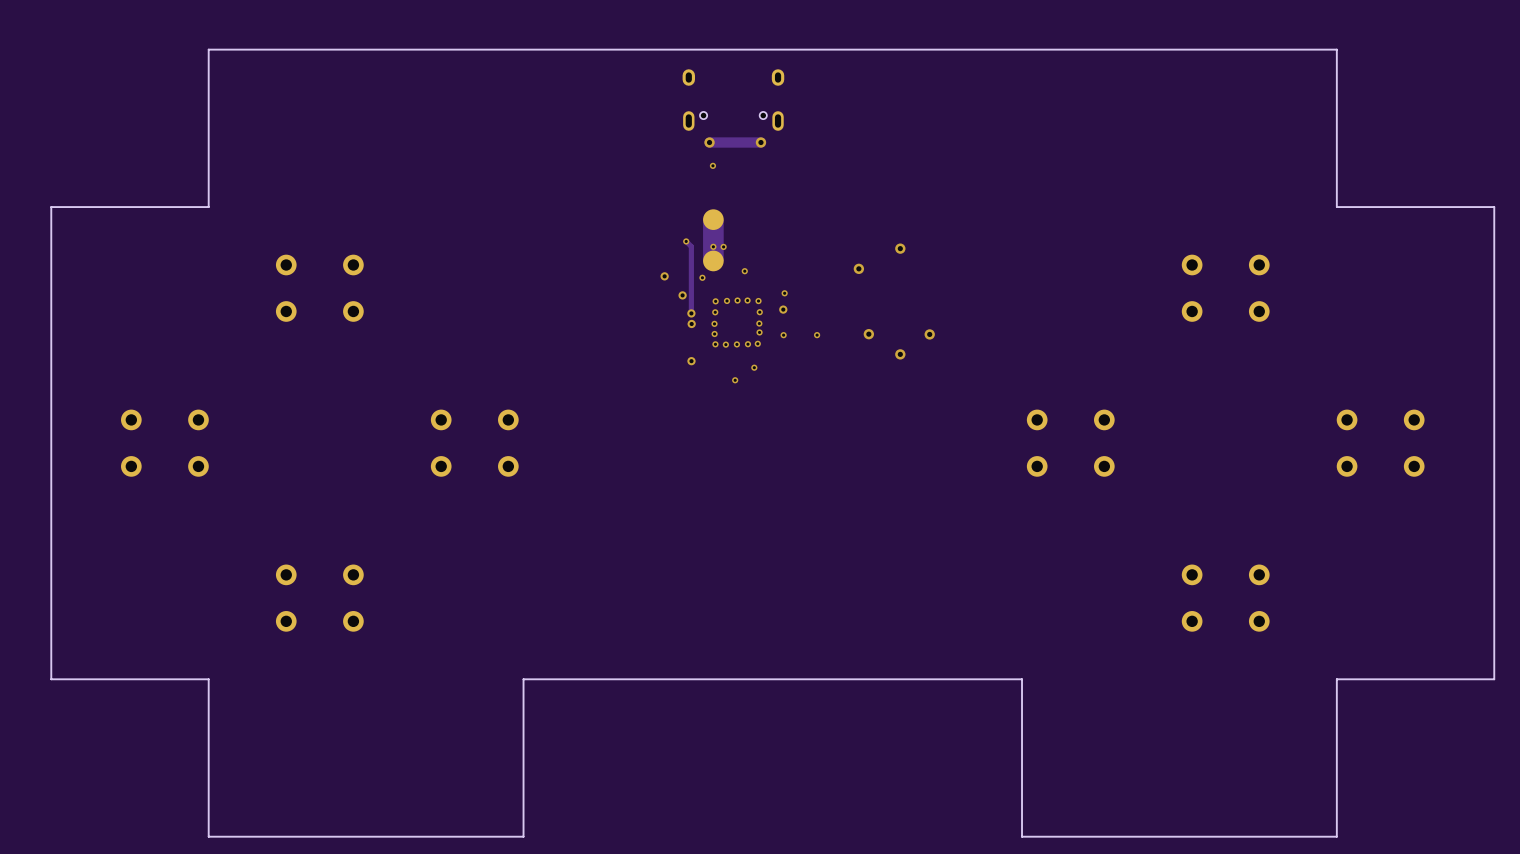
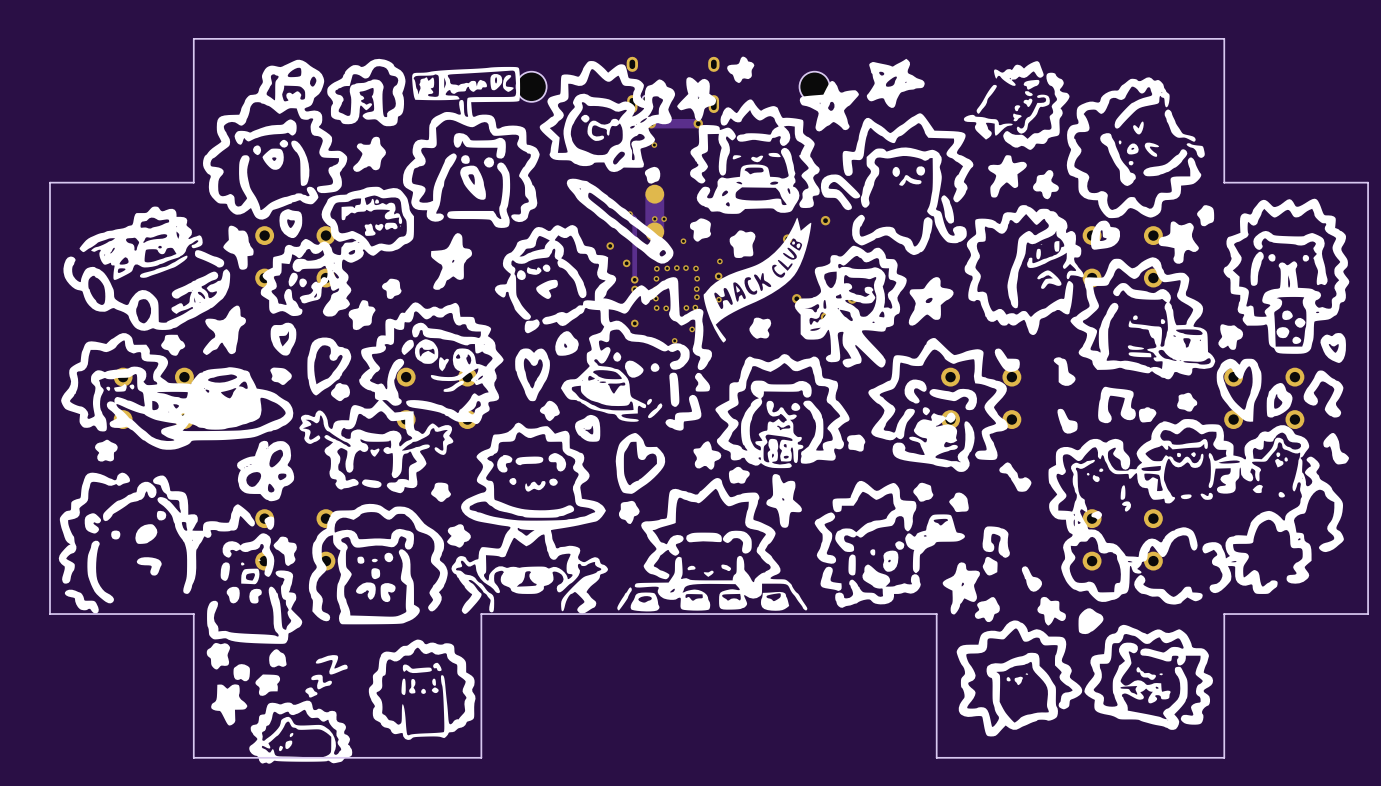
drawing: none -> [58, 56, 1350, 764]
part: none -> (531, 86)
part: none -> (814, 86)

